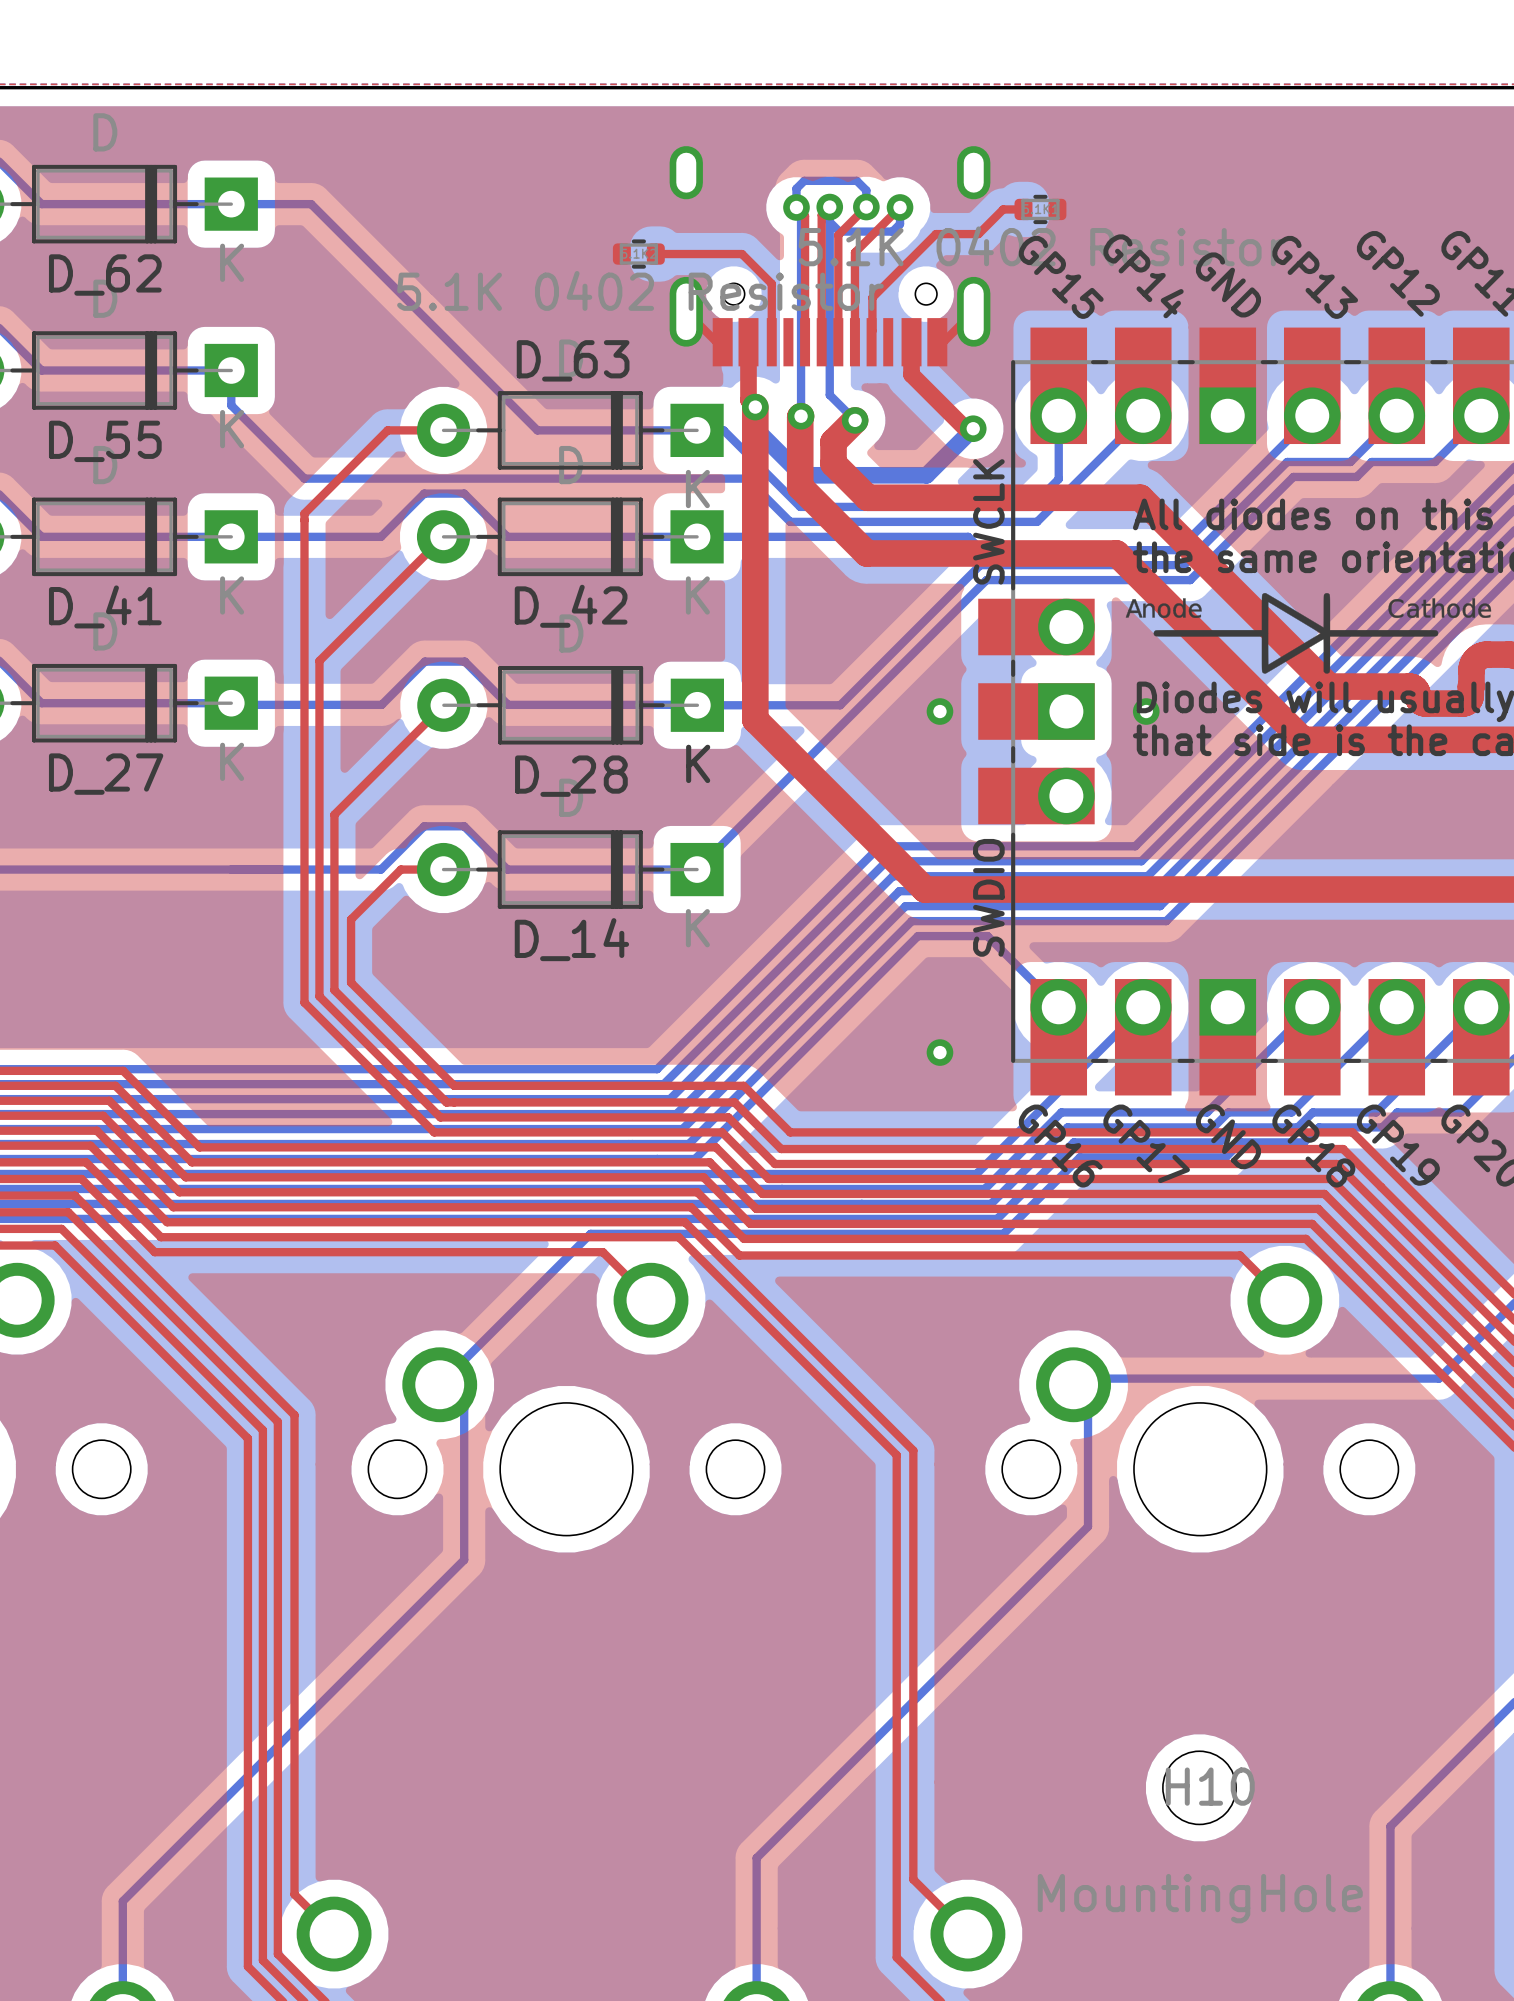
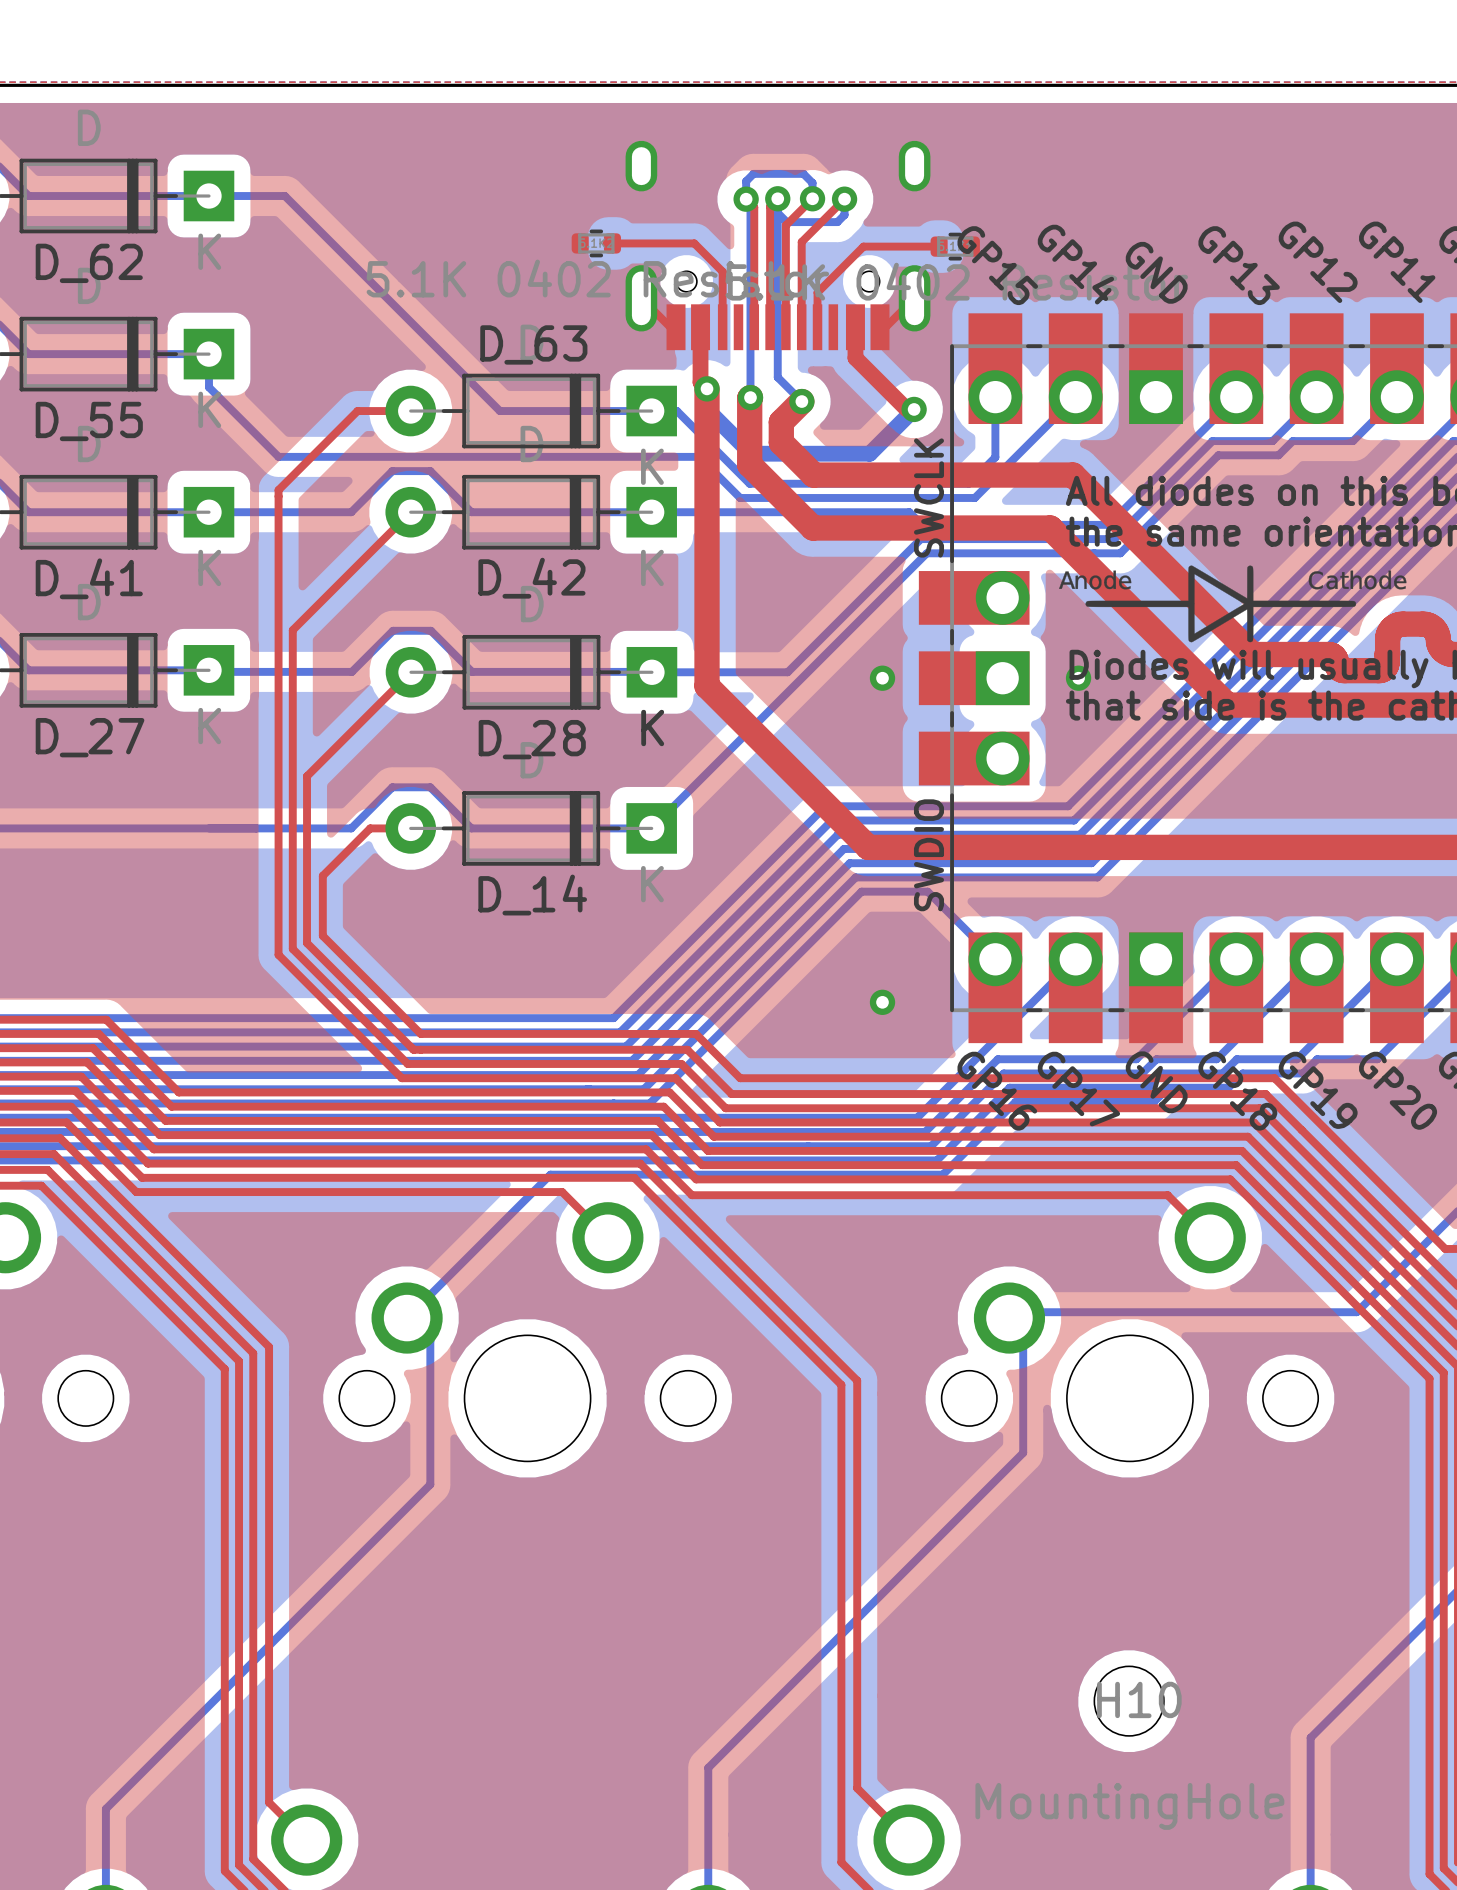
top track: (1023, 209) (1003, 209) (978, 234) (935, 234) (872, 297) (871, 331) -> (939, 246) (863, 246) (817, 292) (817, 317)
part position: (1040, 209) -> (955, 246)

